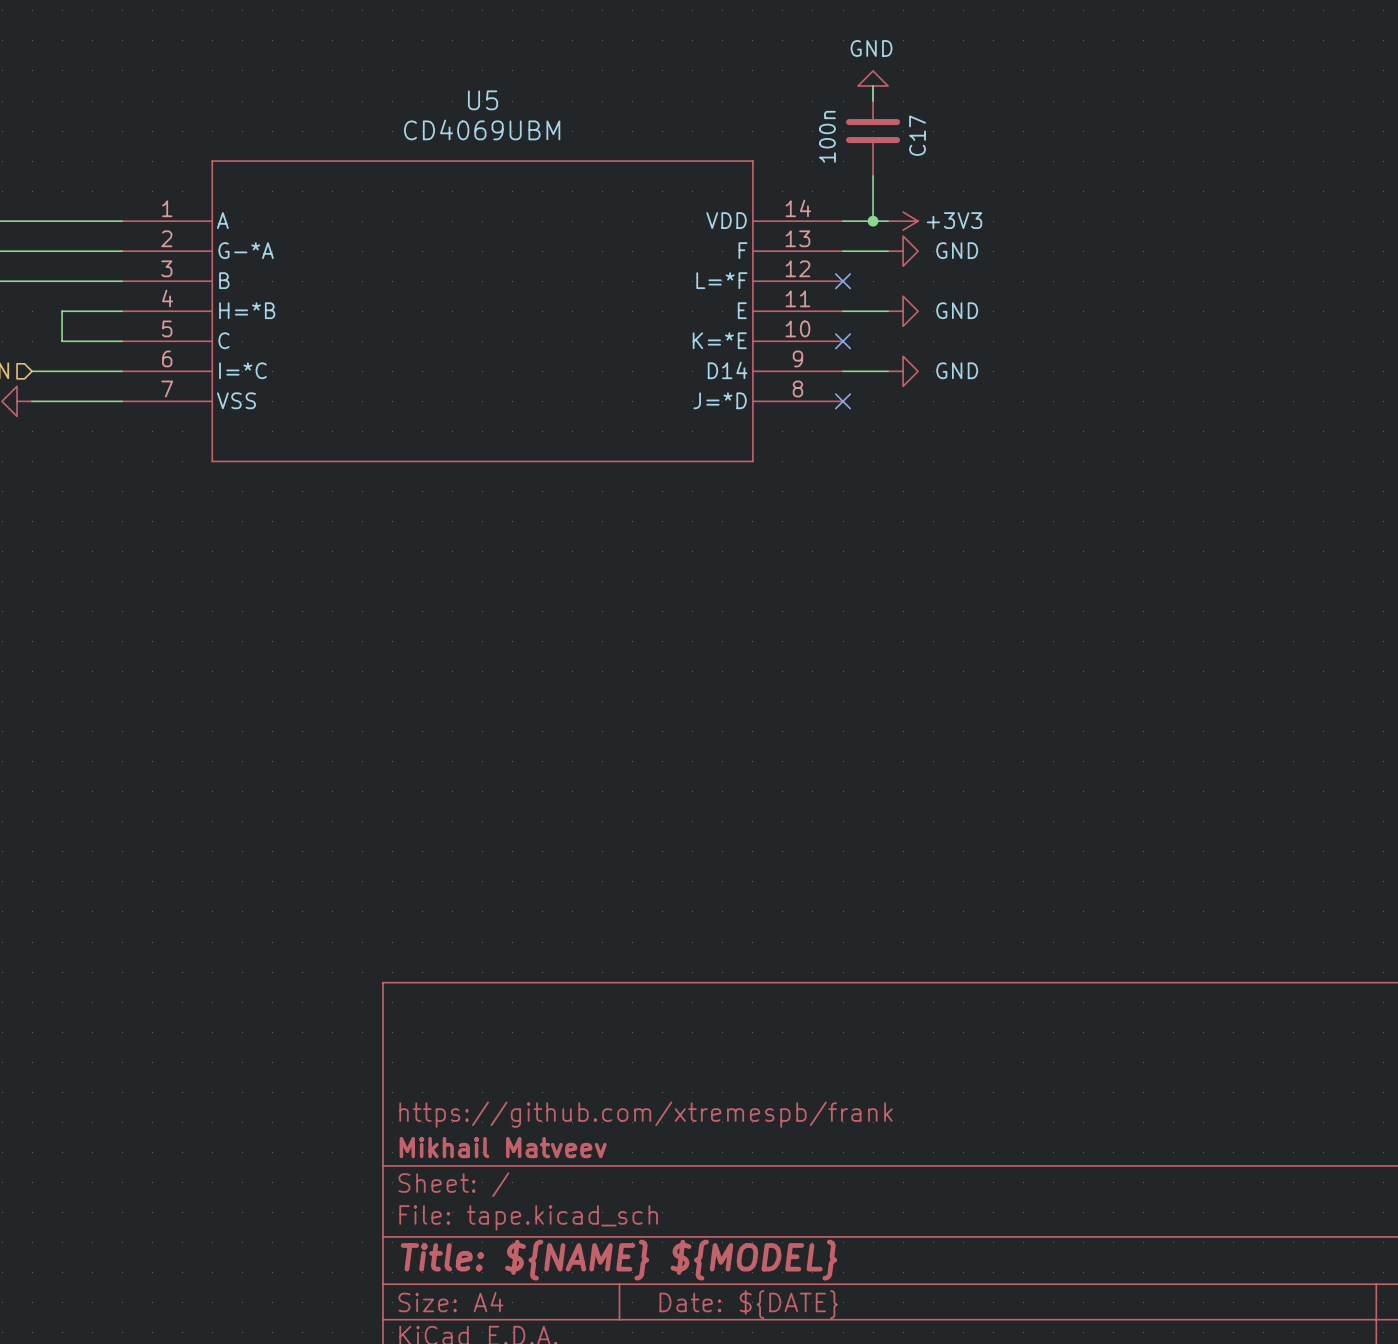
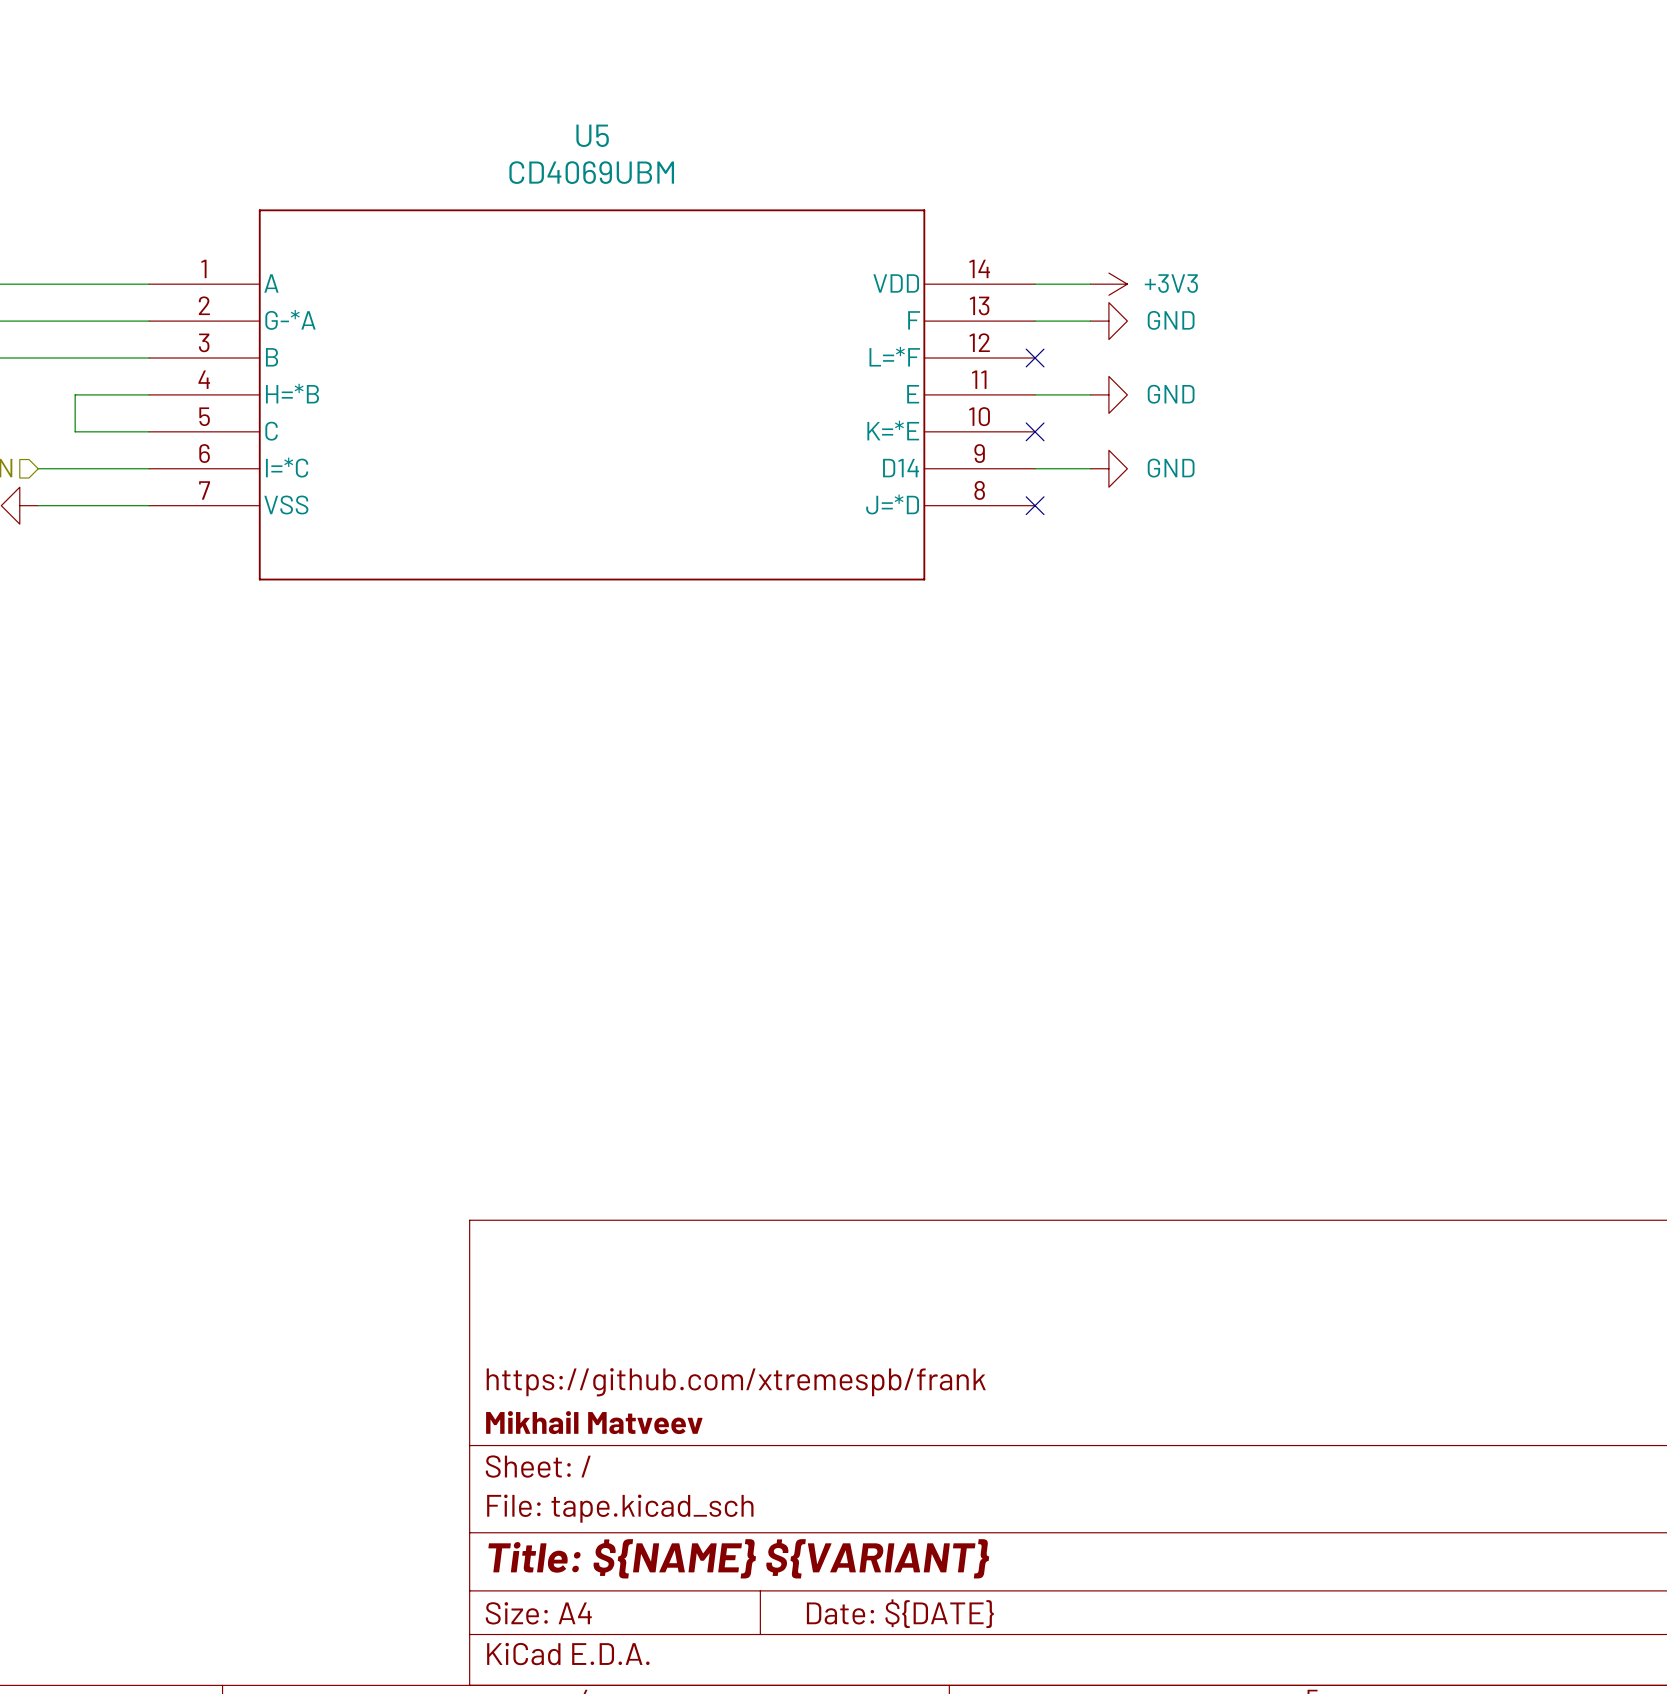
wire: (873, 85) (873, 101) -> none
power symbol: GND (873, 85) -> none
C17: 100n (873, 131) -> none
wire: (873, 176) (873, 221) -> none
junction: (873, 221) -> none
title block: Title: ${NAME} ${MODEL} (619, 1260) -> Title: ${NAME} ${VARIANT} (738, 1558)

